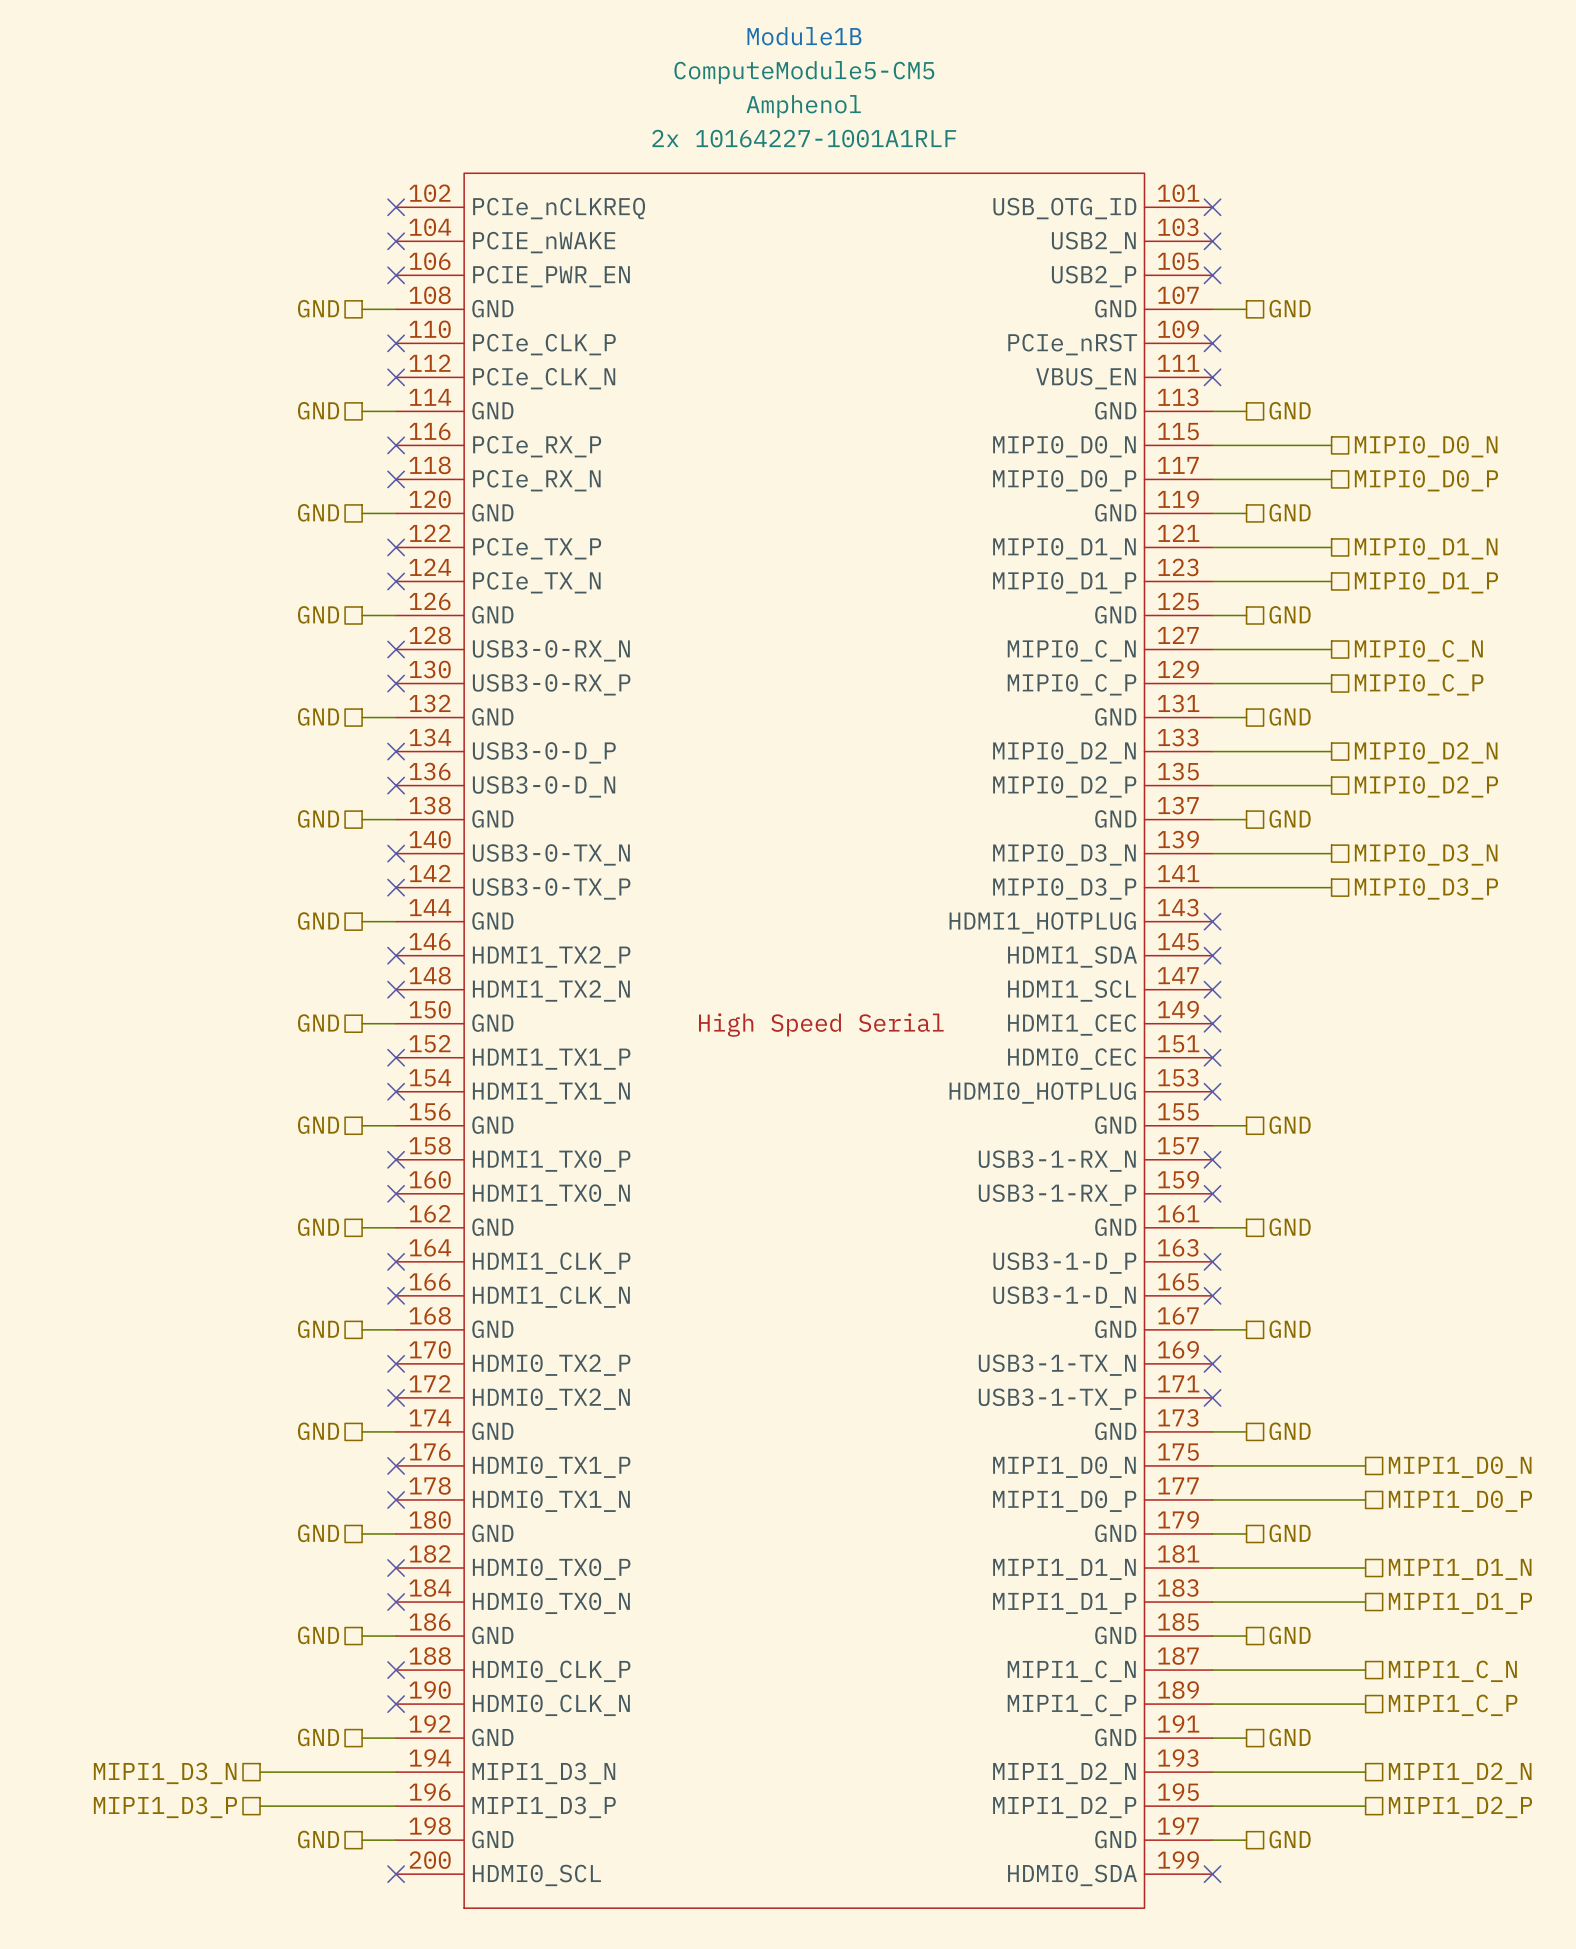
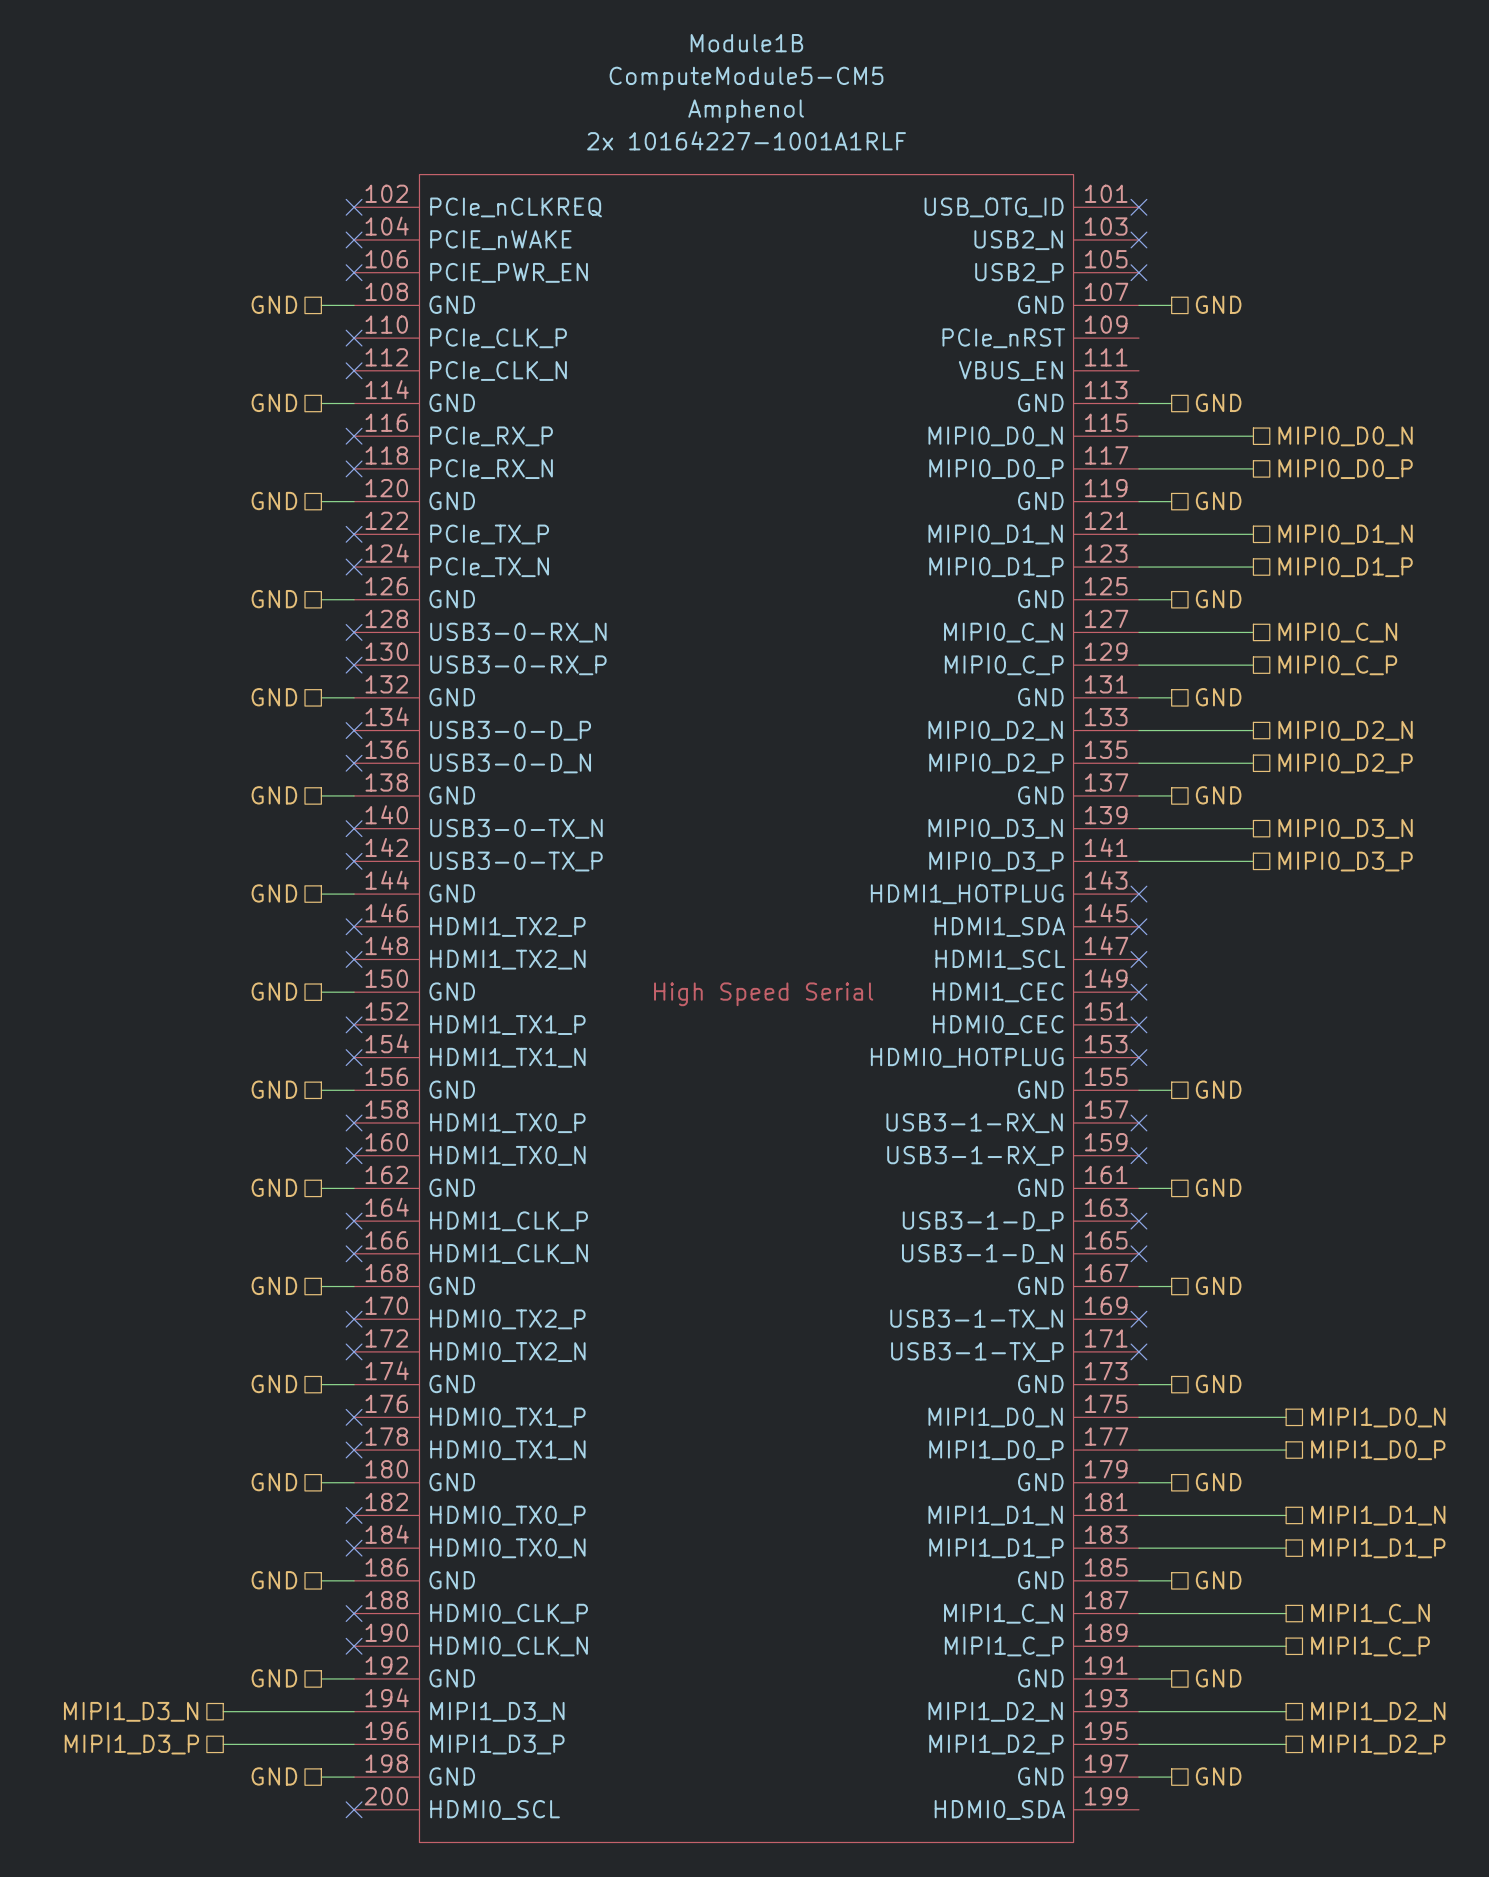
no-connect mark: (1212, 343) -> none
no-connect mark: (1212, 377) -> none
no-connect mark: (1212, 1874) -> none

